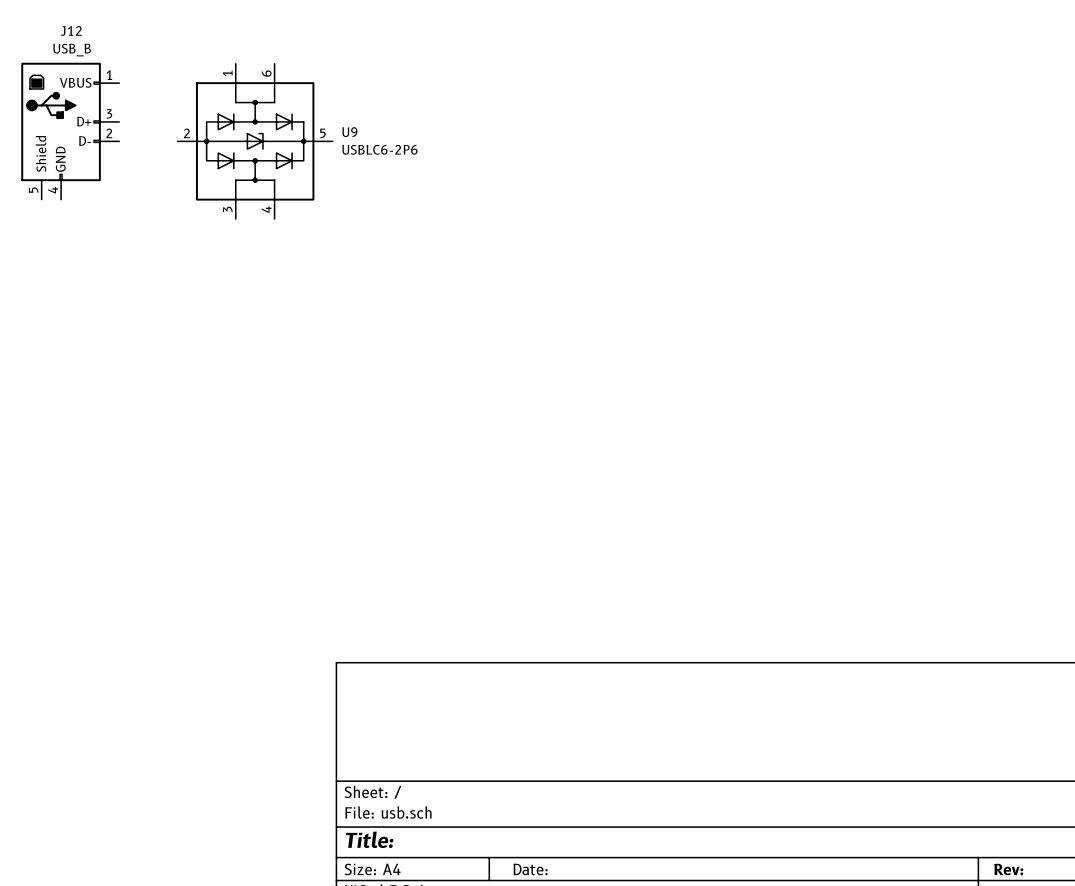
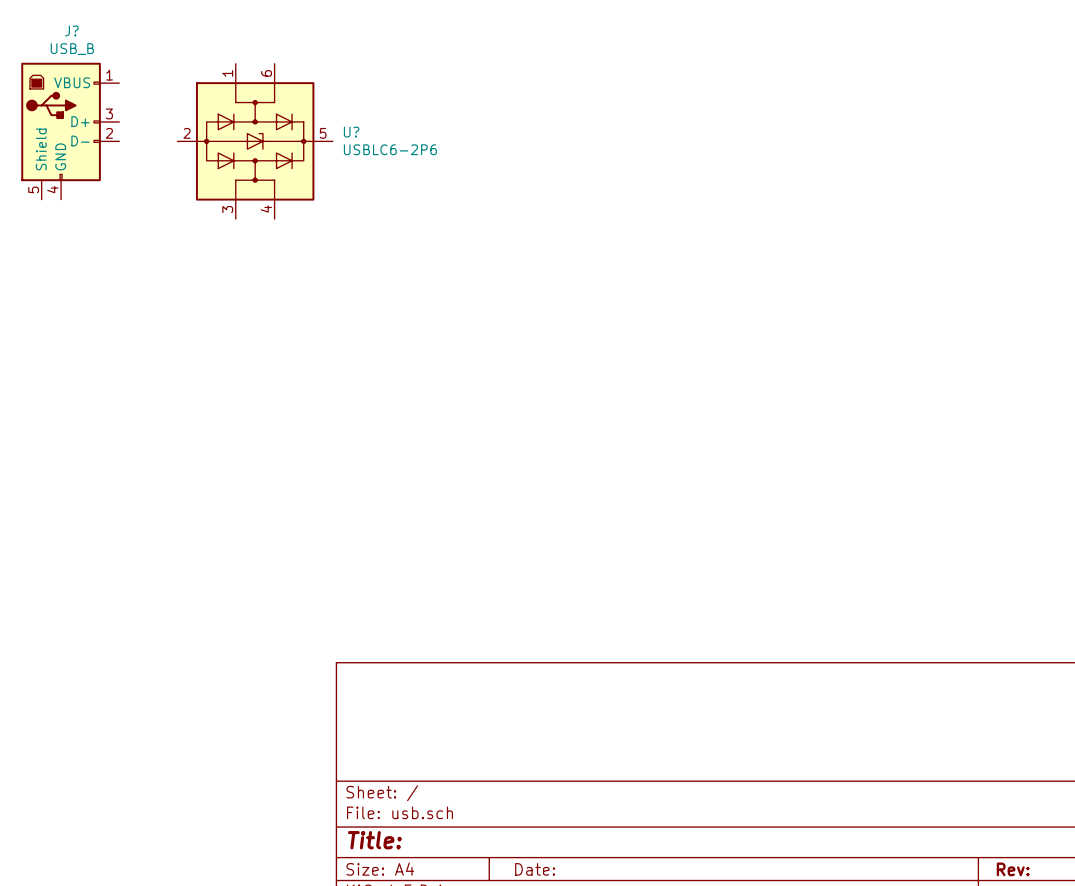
J12 name: J12 (71, 31) -> J? (71, 30)
U9 name: U9 (349, 132) -> U? (351, 132)

